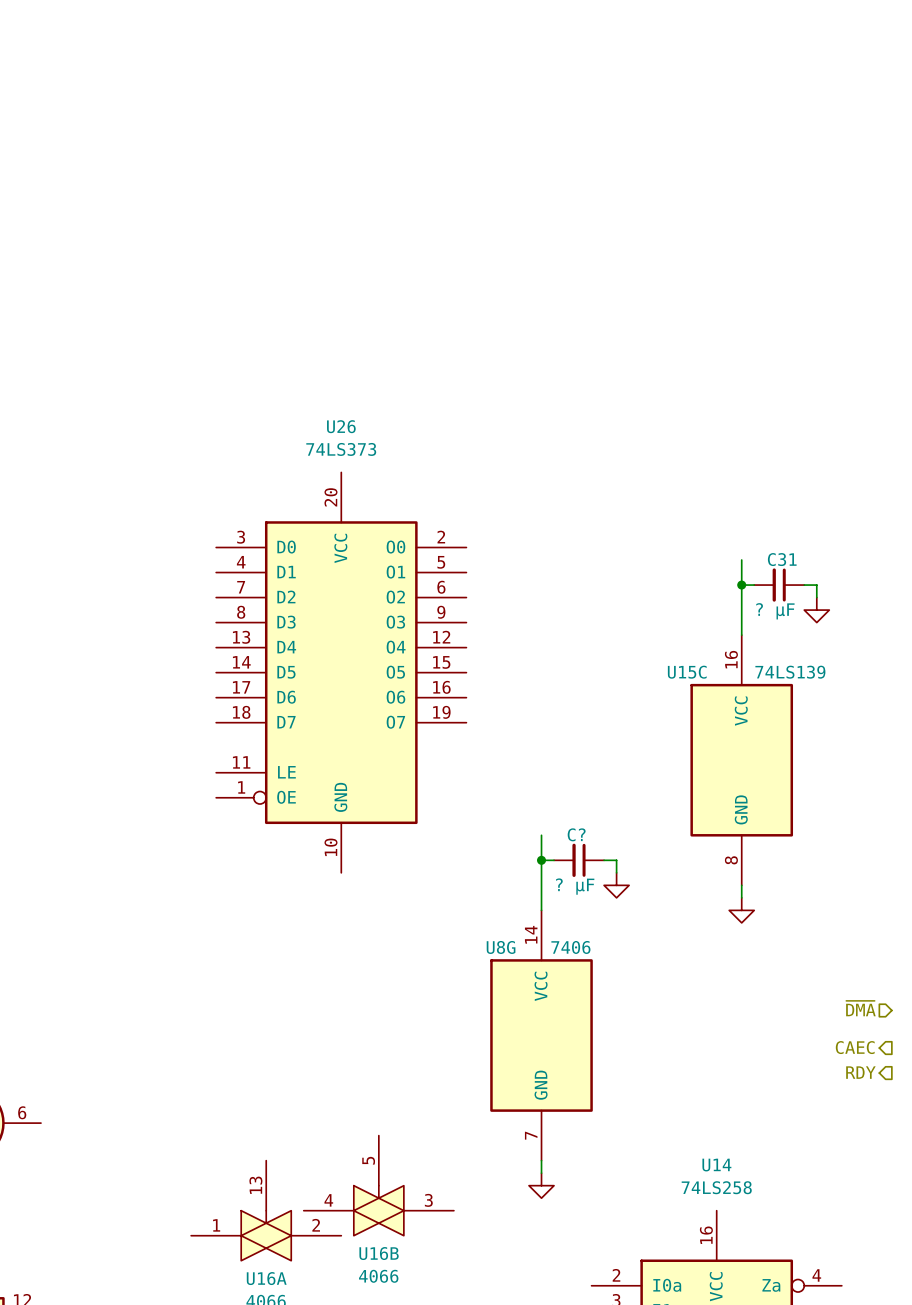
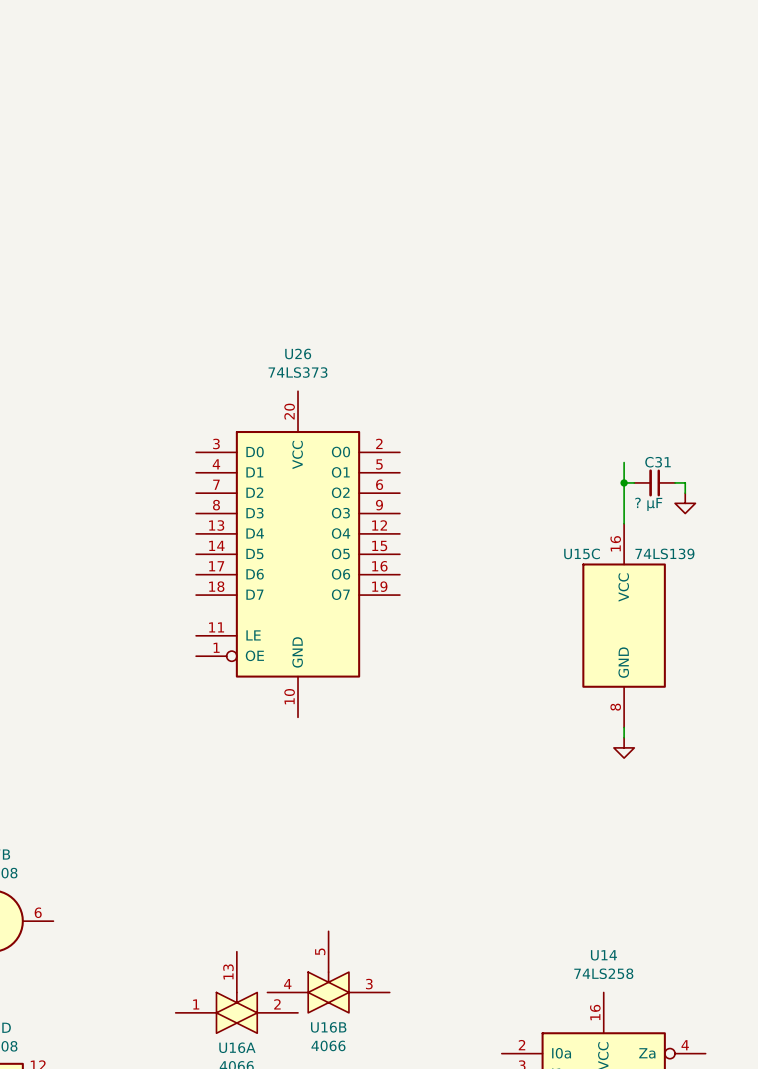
wire: (541, 835) (541, 910) -> none
wire: (541, 860) (554, 860) -> none
junction: (541, 860) -> none
C?: ? μF (579, 860) -> none
wire: (604, 860) (616, 860) (616, 872) -> none
power symbol: (616, 885) -> none
hierarchical label: ~{DMA} (860, 1008) -> none
U8G: 7406 (541, 1035) -> none
hierarchical label: CAEC (855, 1047) -> none
hierarchical label: RDY (860, 1072) -> none
wire: (541, 1160) (541, 1173) -> none
power symbol: (541, 1185) -> none

